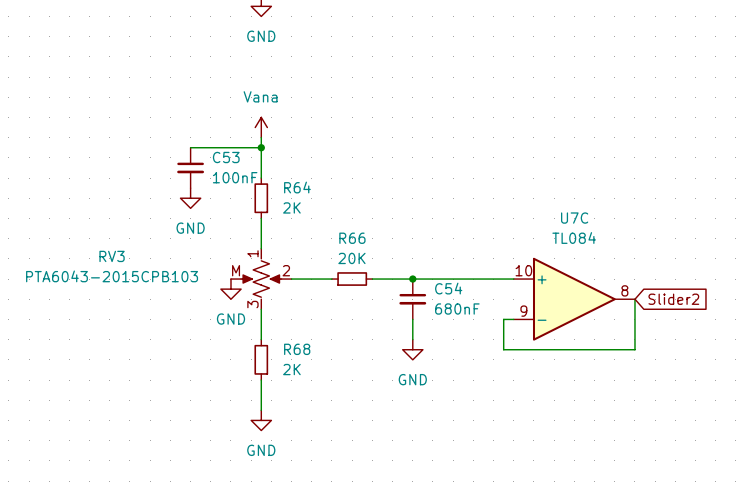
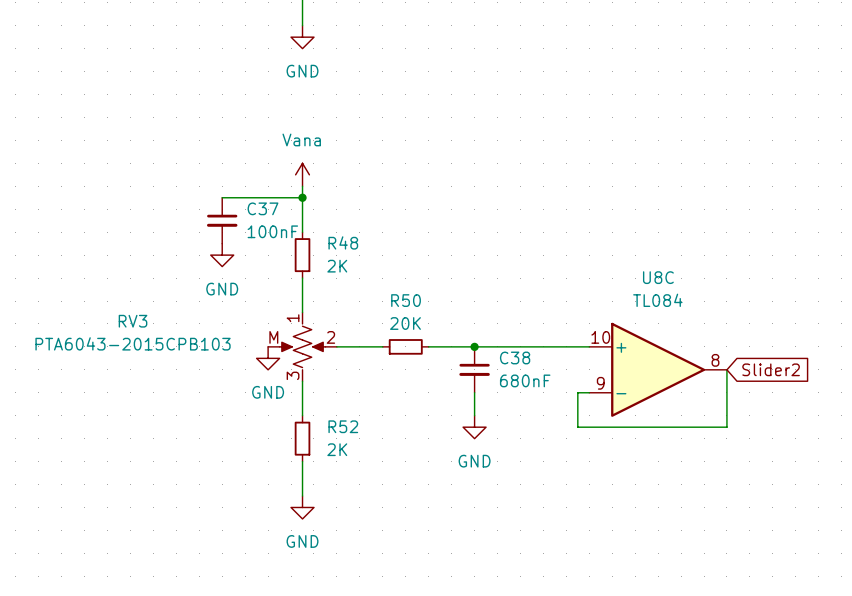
C53 name: C53 (226, 157) -> C37 (263, 208)
R64 name: R64 (297, 187) -> R48 (343, 242)
U7C name: U7C (574, 218) -> U8C (658, 277)
R66 name: R66 (352, 238) -> R50 (406, 300)
C54 name: C54 (448, 288) -> C38 (515, 357)
R68 name: R68 (297, 349) -> R52 (343, 426)

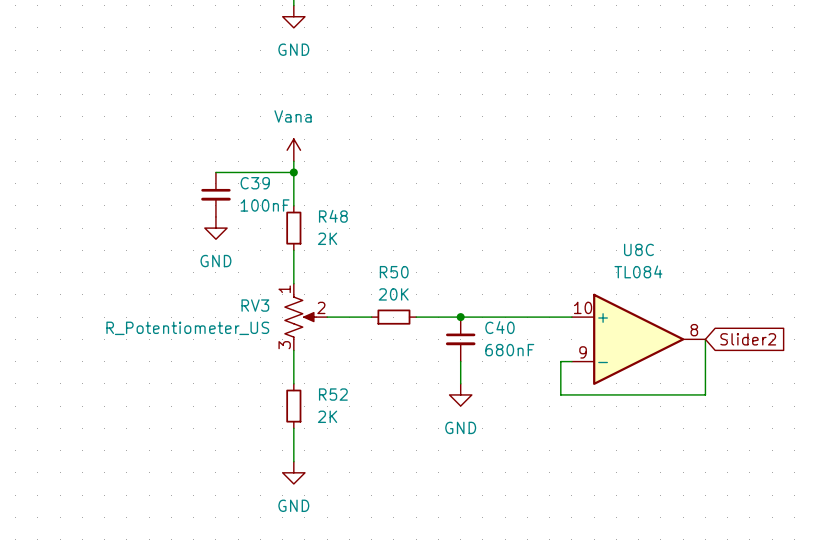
C37 name: C37 (263, 208) -> C39 (255, 183)
RV3 symbol: [268, 312, 337, 382] -> [284, 283, 328, 351]
RV3 name position: RV3 (133, 321) -> RV3 (255, 305)
RV3 value: PTA6043-2015CPB103 (133, 343) -> R_Potentiometer_US (187, 328)
C38 name: C38 (515, 357) -> C40 (499, 327)
power symbol: GND (268, 358) -> none

